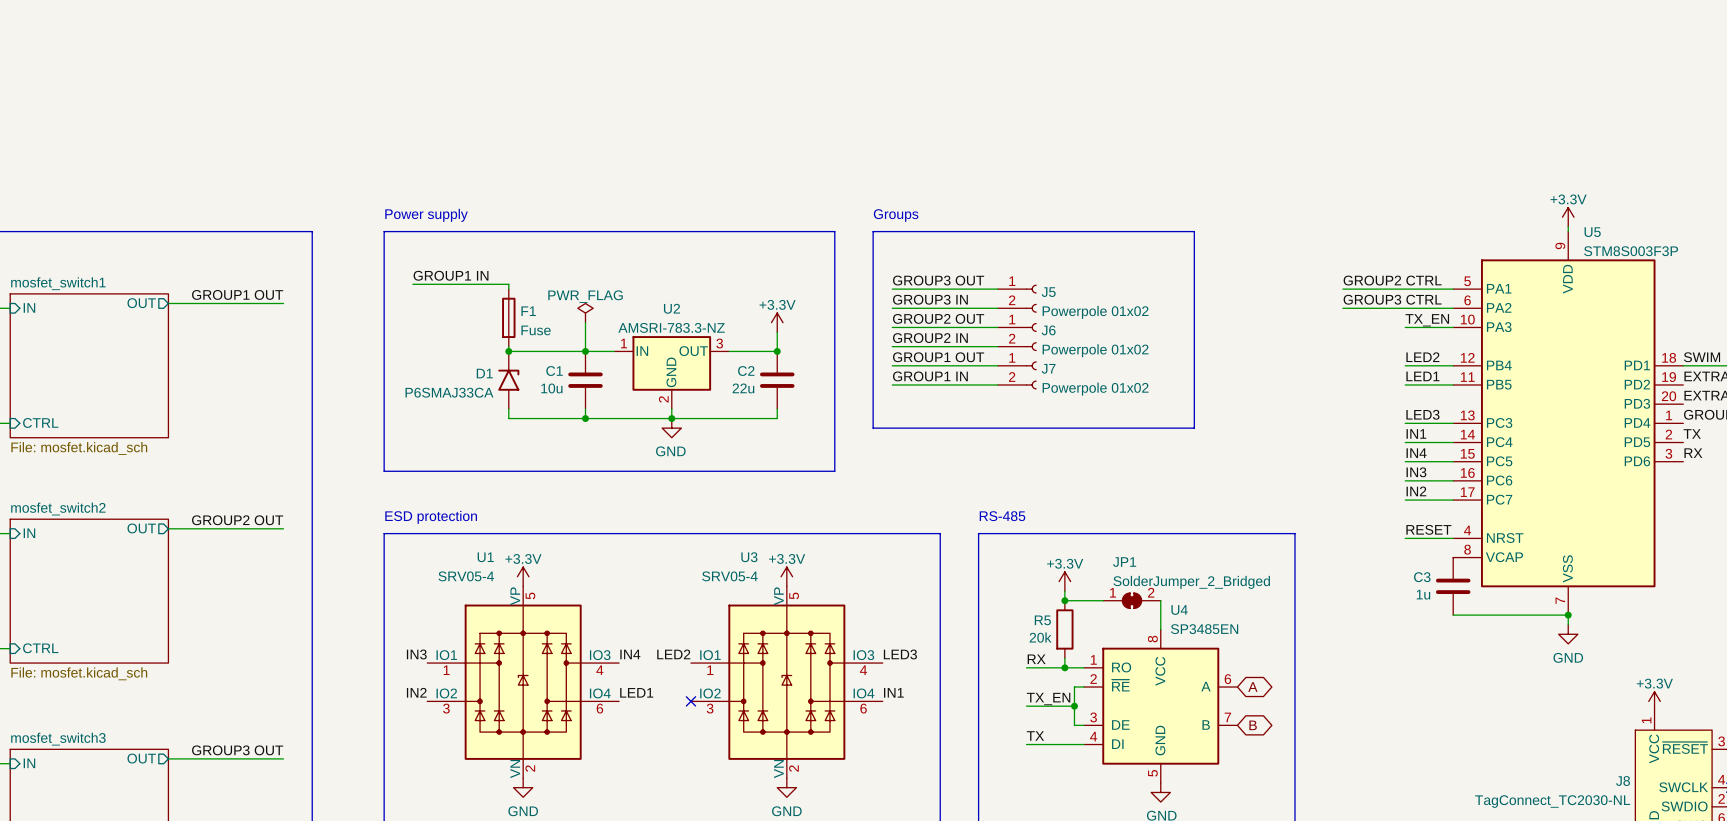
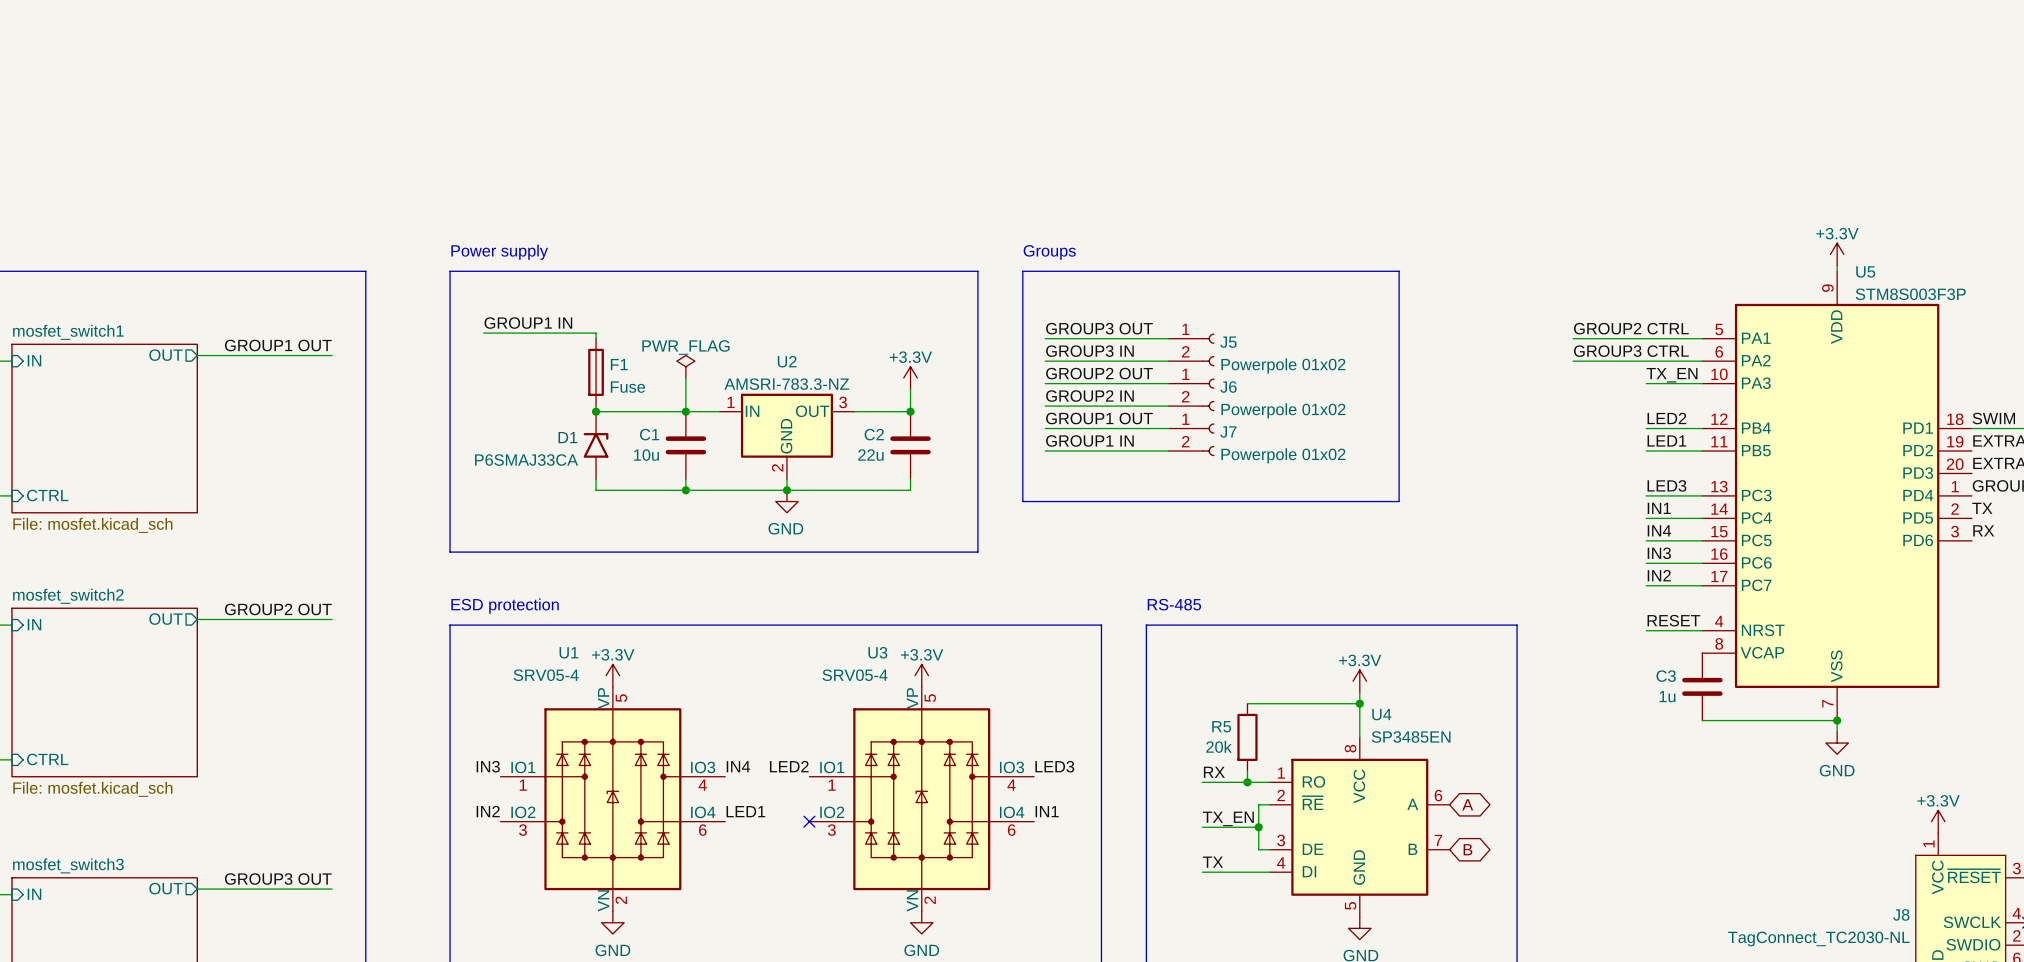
power symbol position: +3.3V (1064, 581) -> +3.3V (1359, 681)
wire: (1064, 591) (1064, 600) -> none
junction: (1064, 600) -> none
JP1: SolderJumper_2_Bridged (1132, 600) -> none
junction: none -> (1359, 703)

